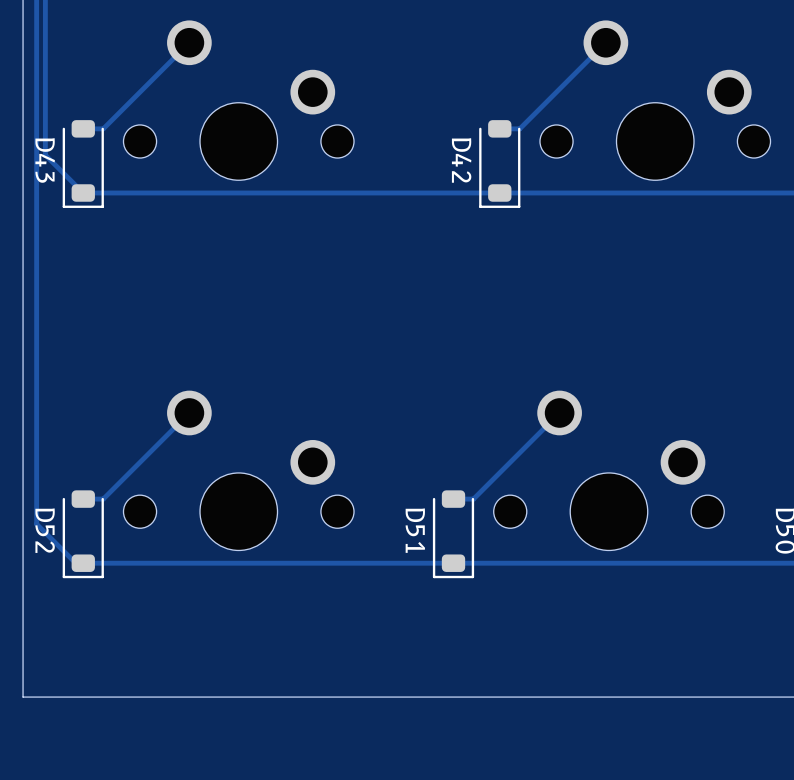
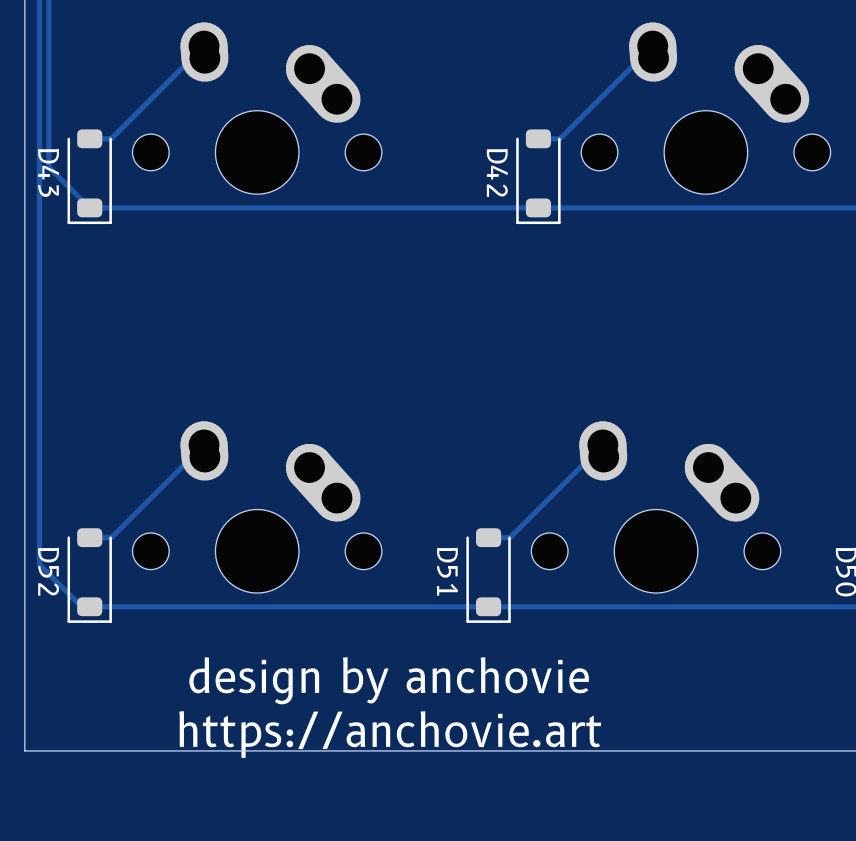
part footprint: [123, 20, 355, 181] -> [132, 22, 382, 195]
part footprint: [539, 20, 771, 181] -> [581, 22, 831, 195]
part footprint: [123, 390, 355, 551] -> [132, 421, 382, 594]
part footprint: [493, 390, 725, 551] -> [531, 421, 781, 594]
text: none -> design by anchovie (389, 680)
text: none -> https://anchovie.art (390, 734)

